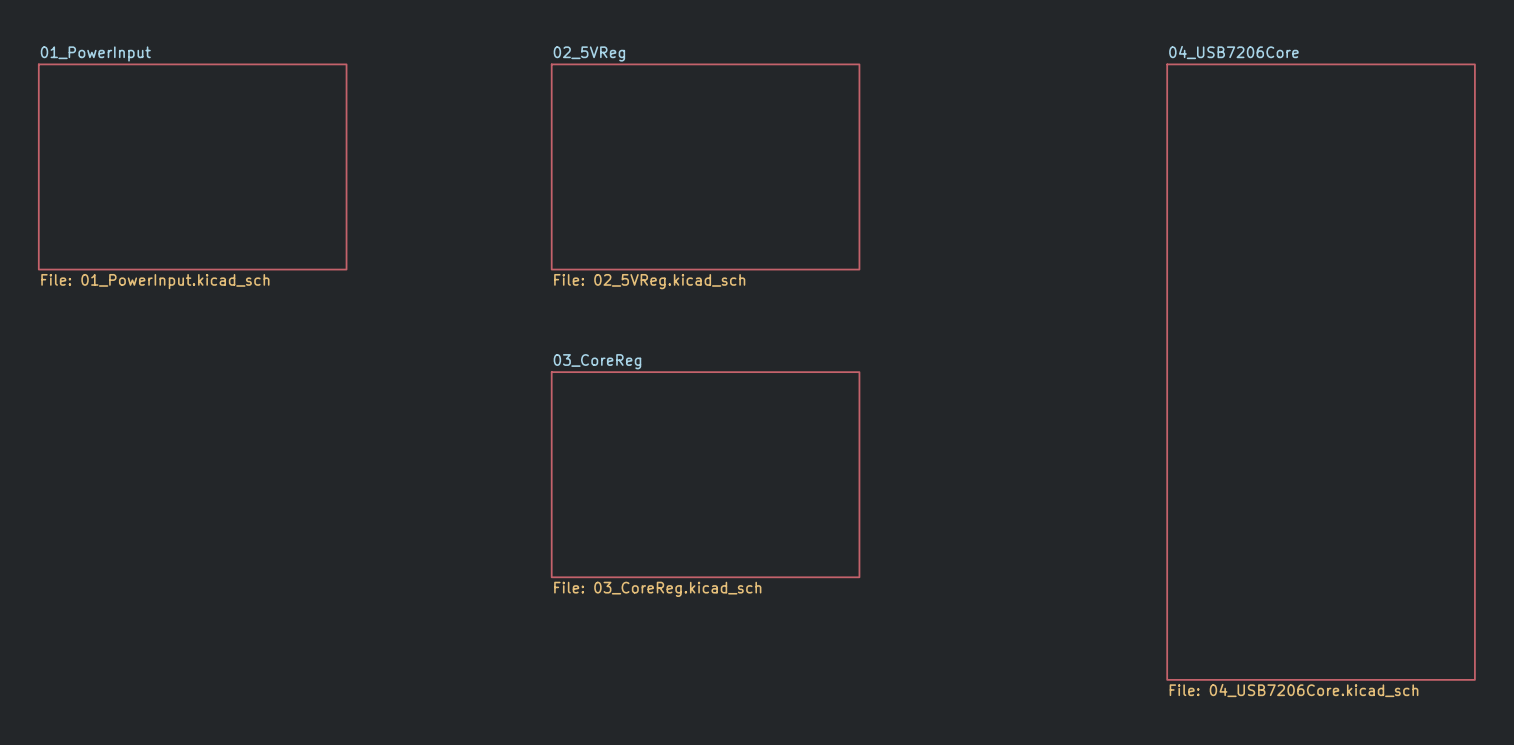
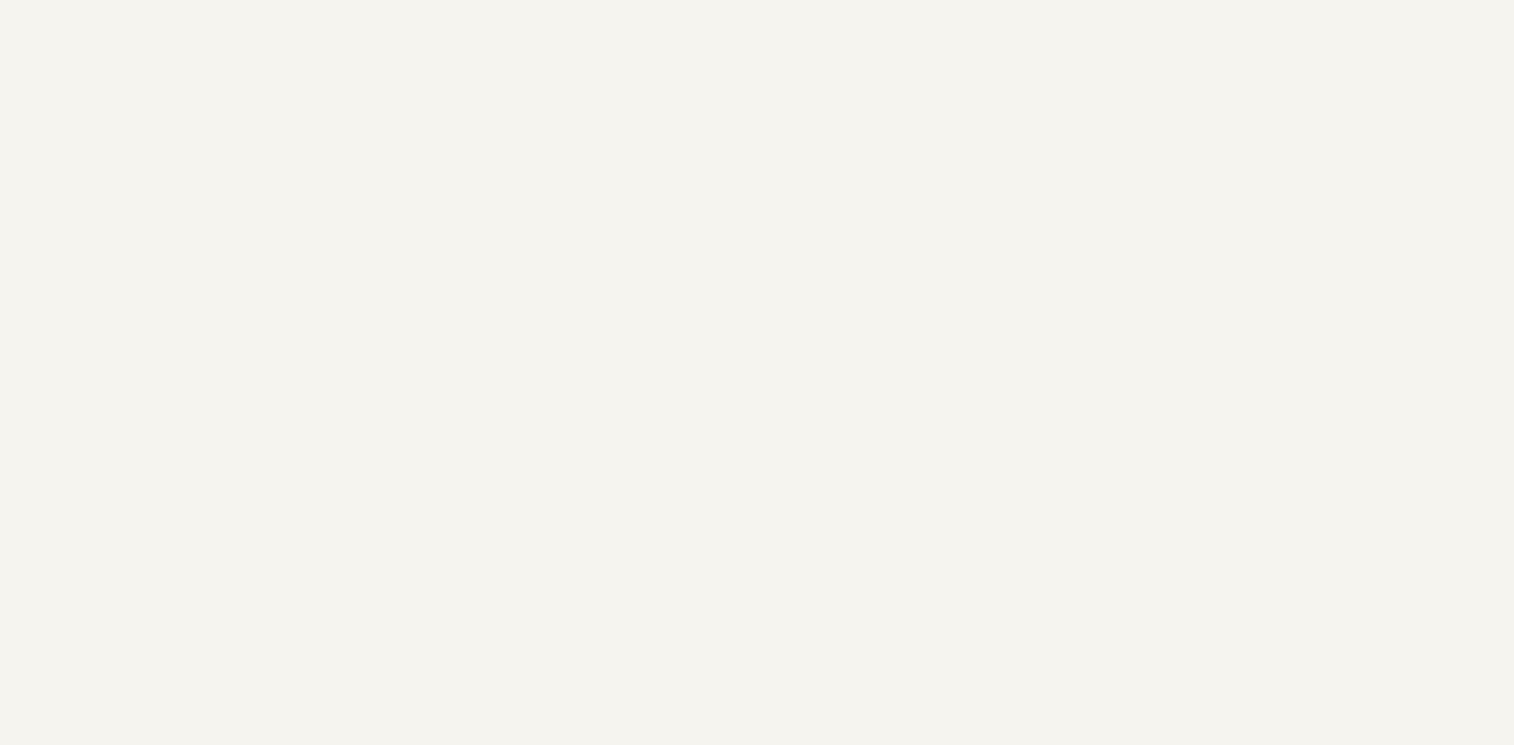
sheet 01_PowerInput: File: 01_PowerInput.kicad_sch (192, 166) -> none
sheet 02_5VReg: File: 02_5VReg.kicad_sch (705, 166) -> none
sheet 04_USB7206Core: File: 04_USB7206Core.kicad_sch (1321, 372) -> none
sheet 03_CoreReg: File: 03_CoreReg.kicad_sch (705, 474) -> none

